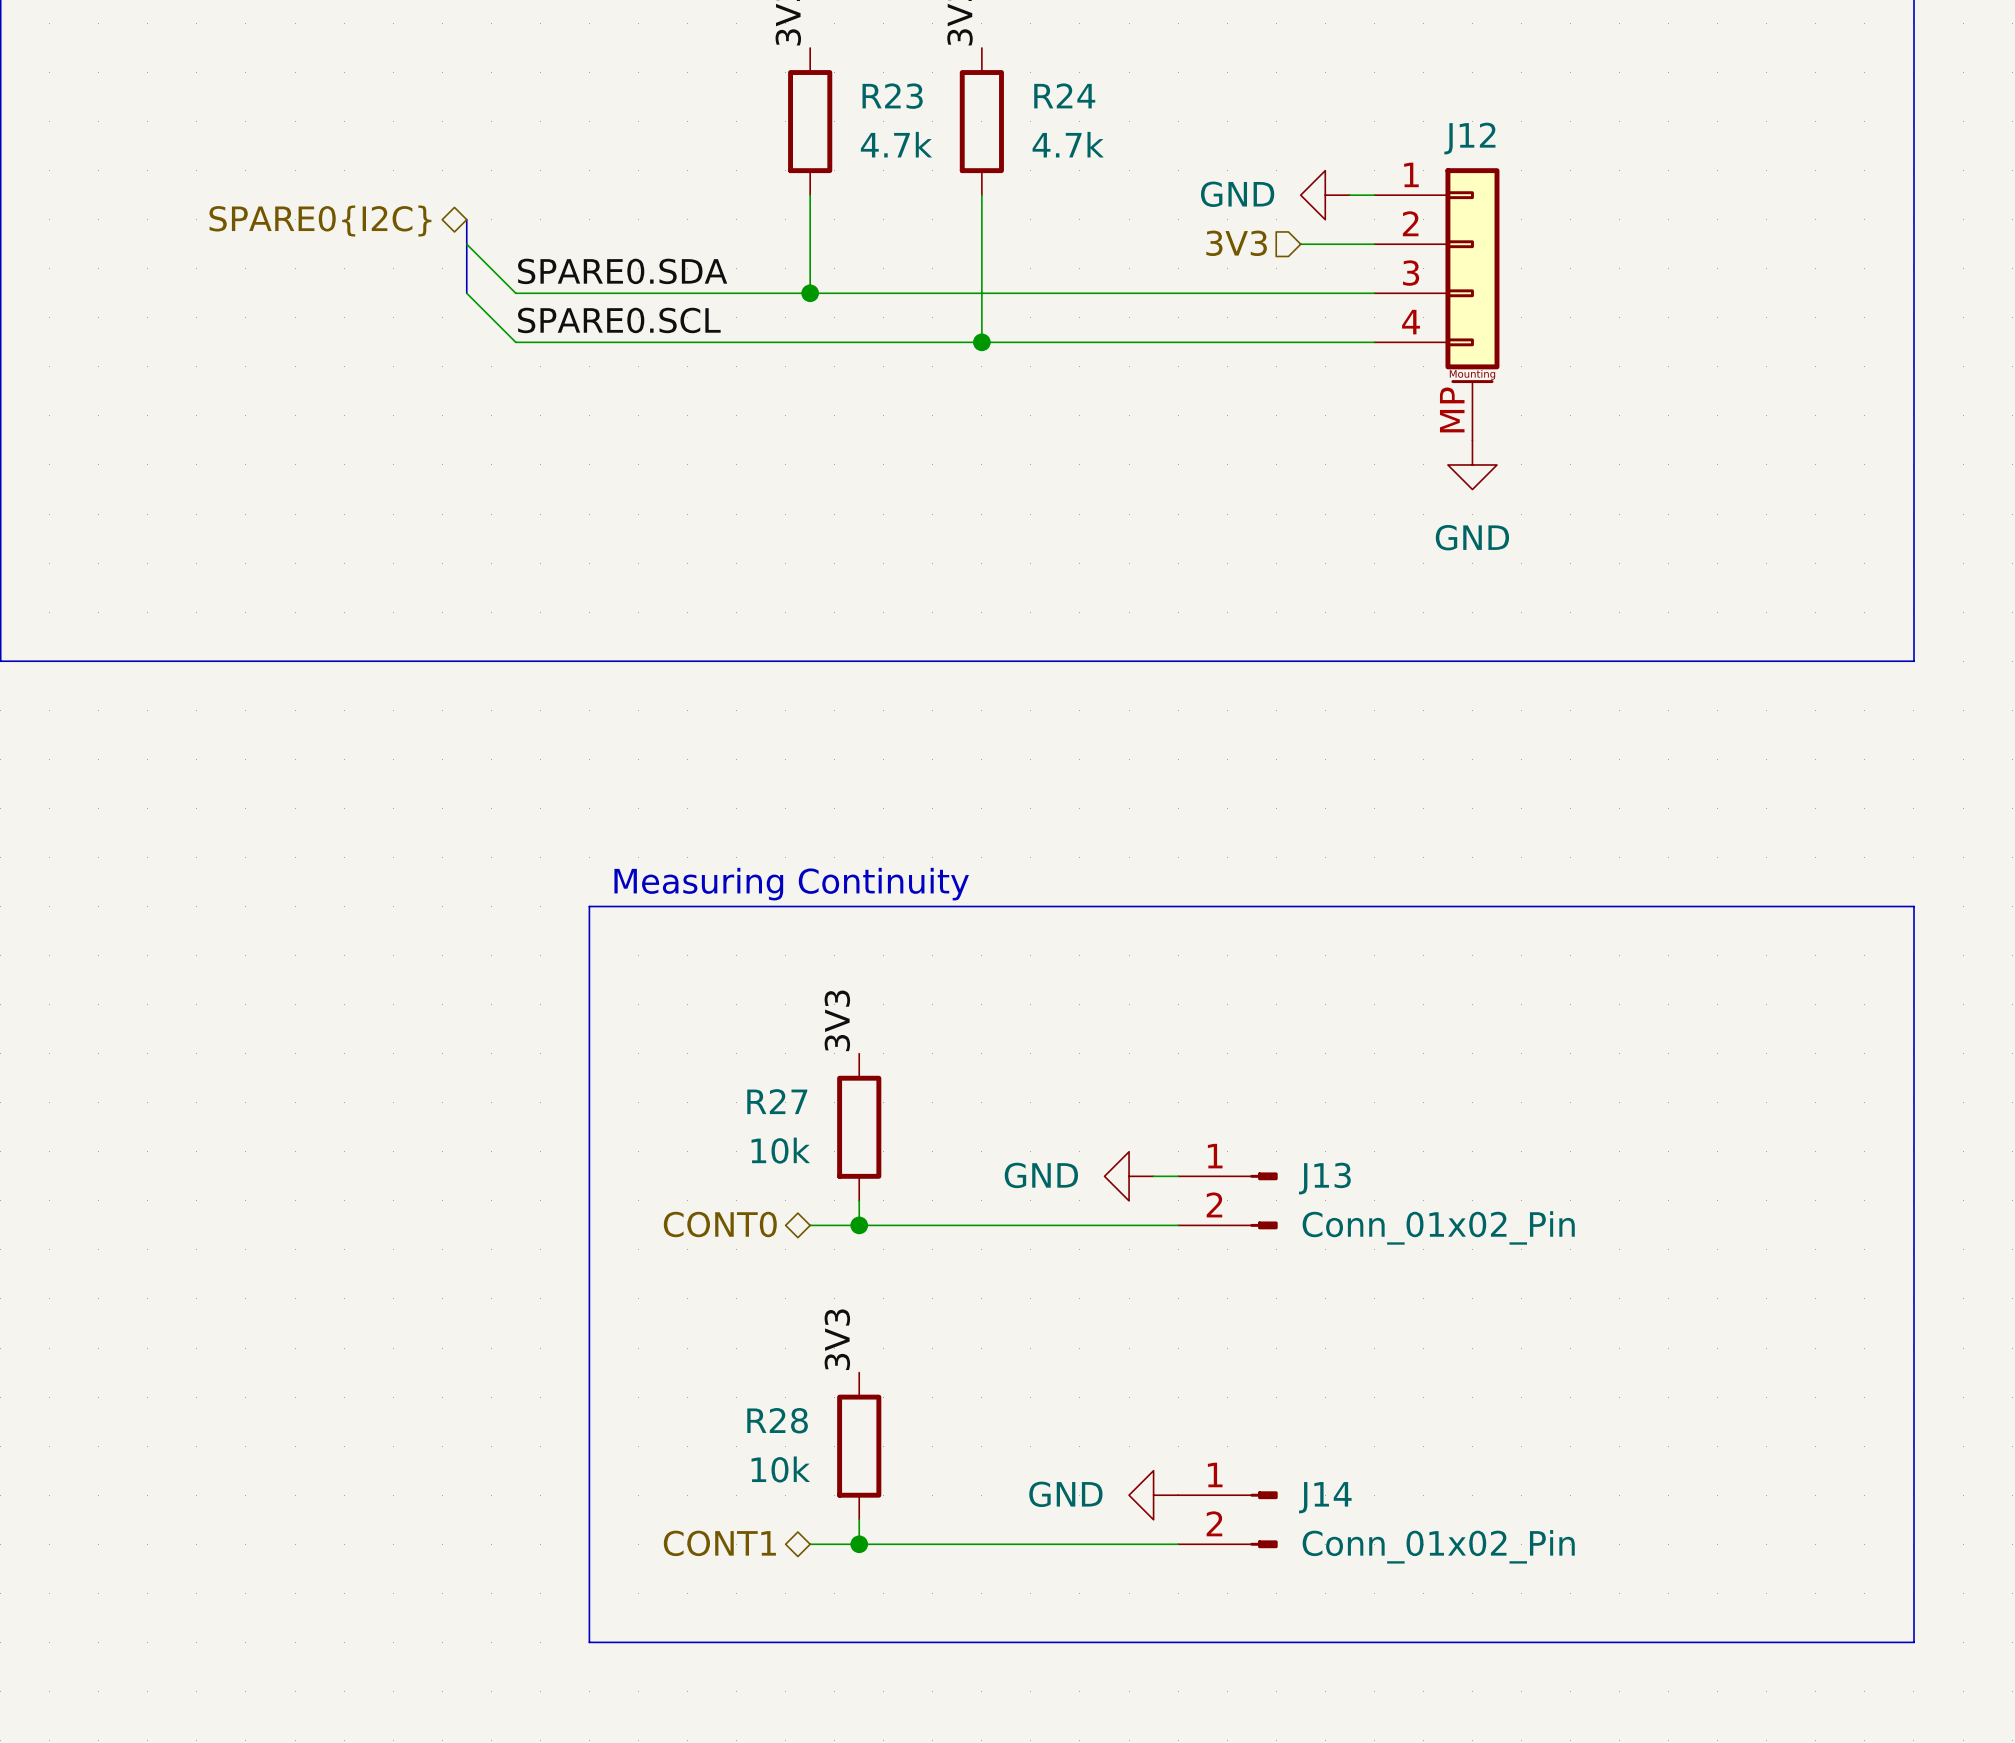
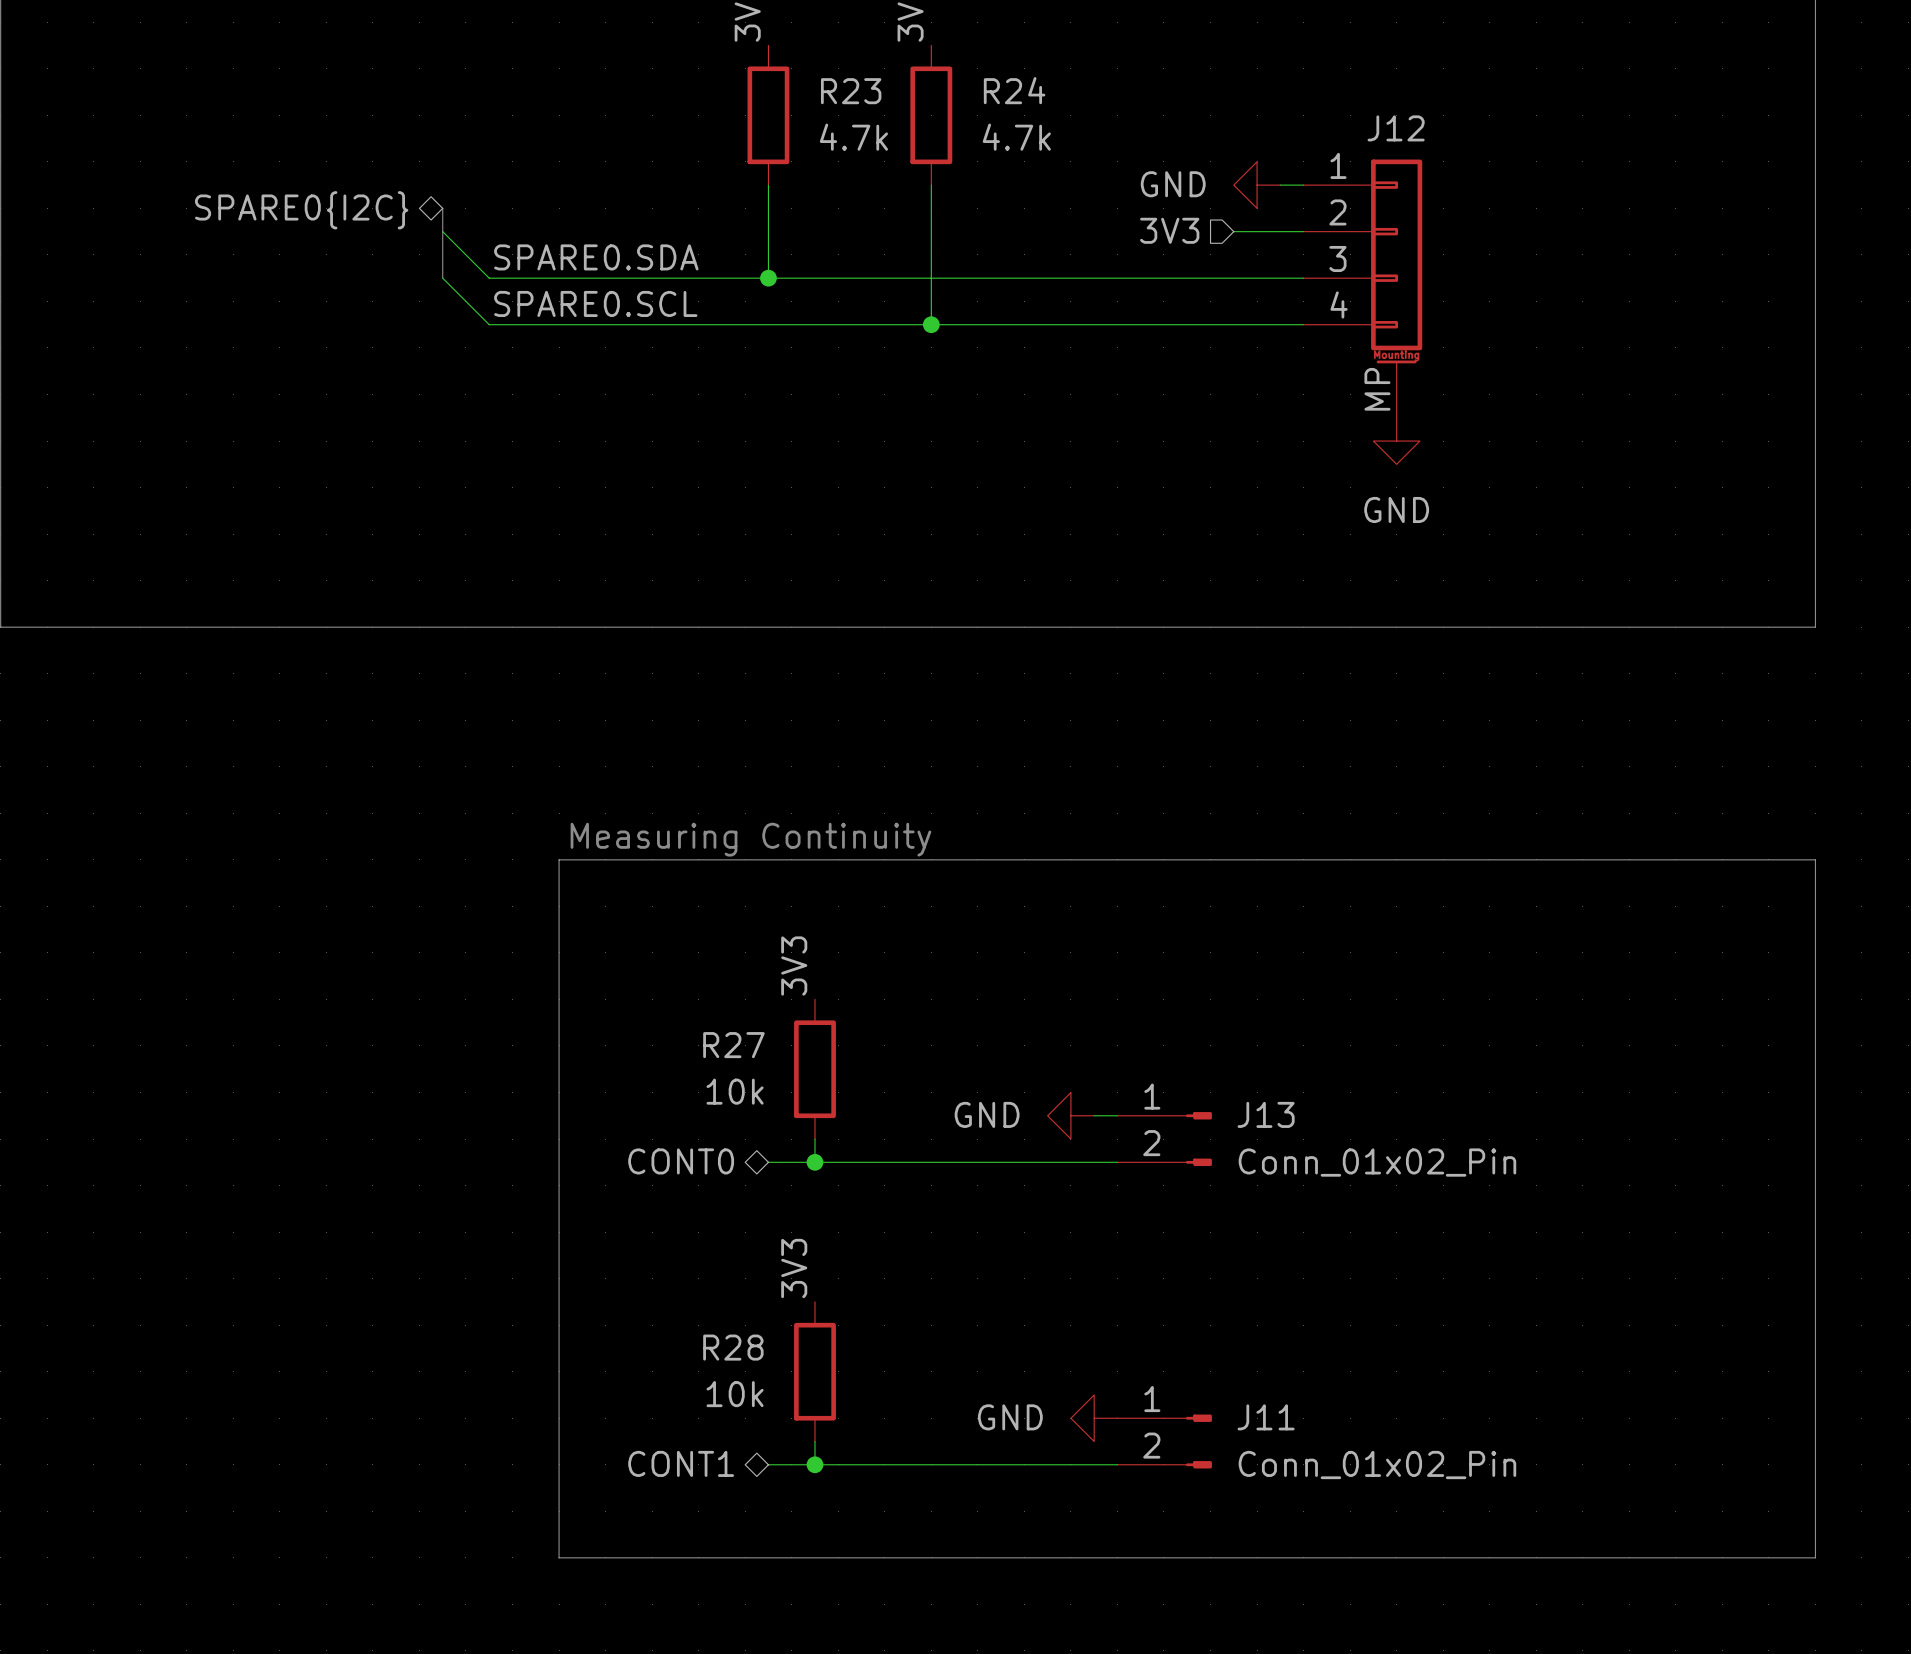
J14 name: J14 (1325, 1497) -> J11 (1266, 1417)

